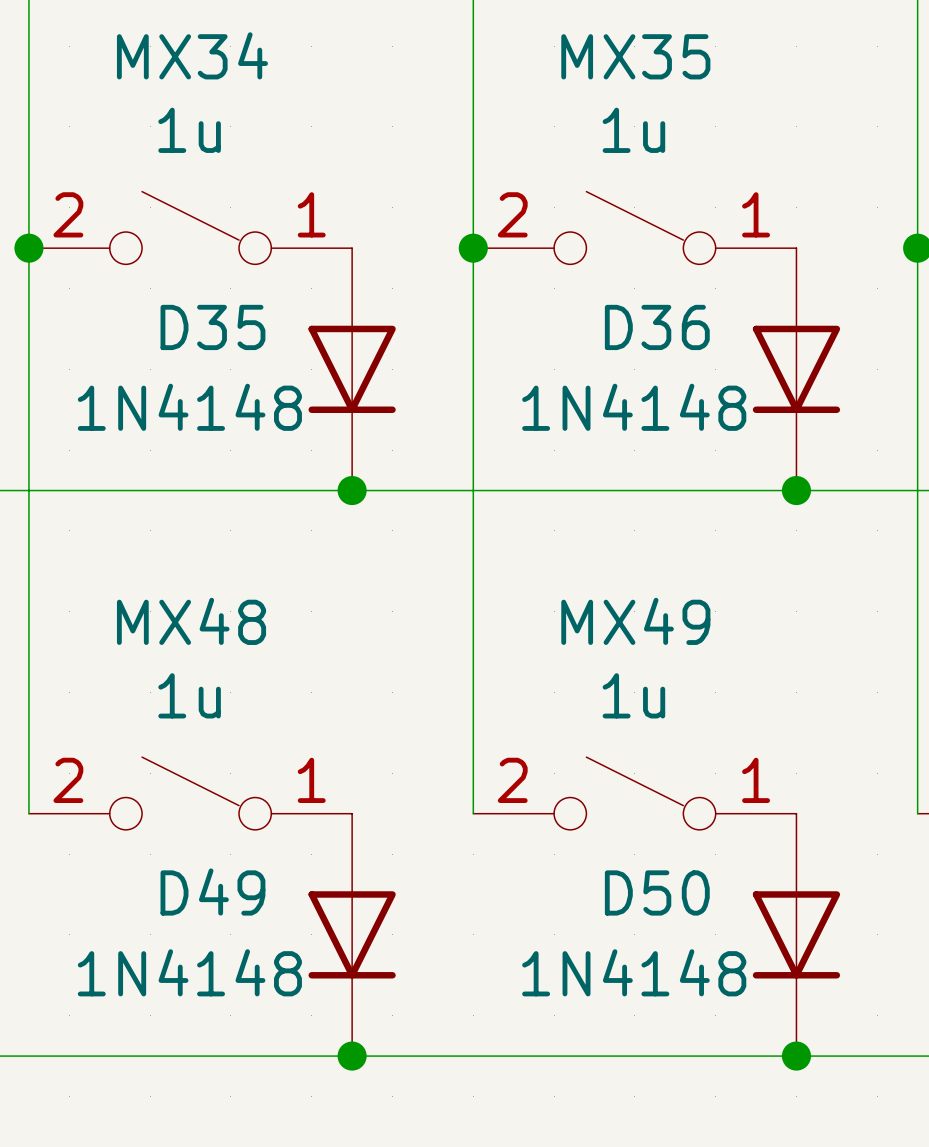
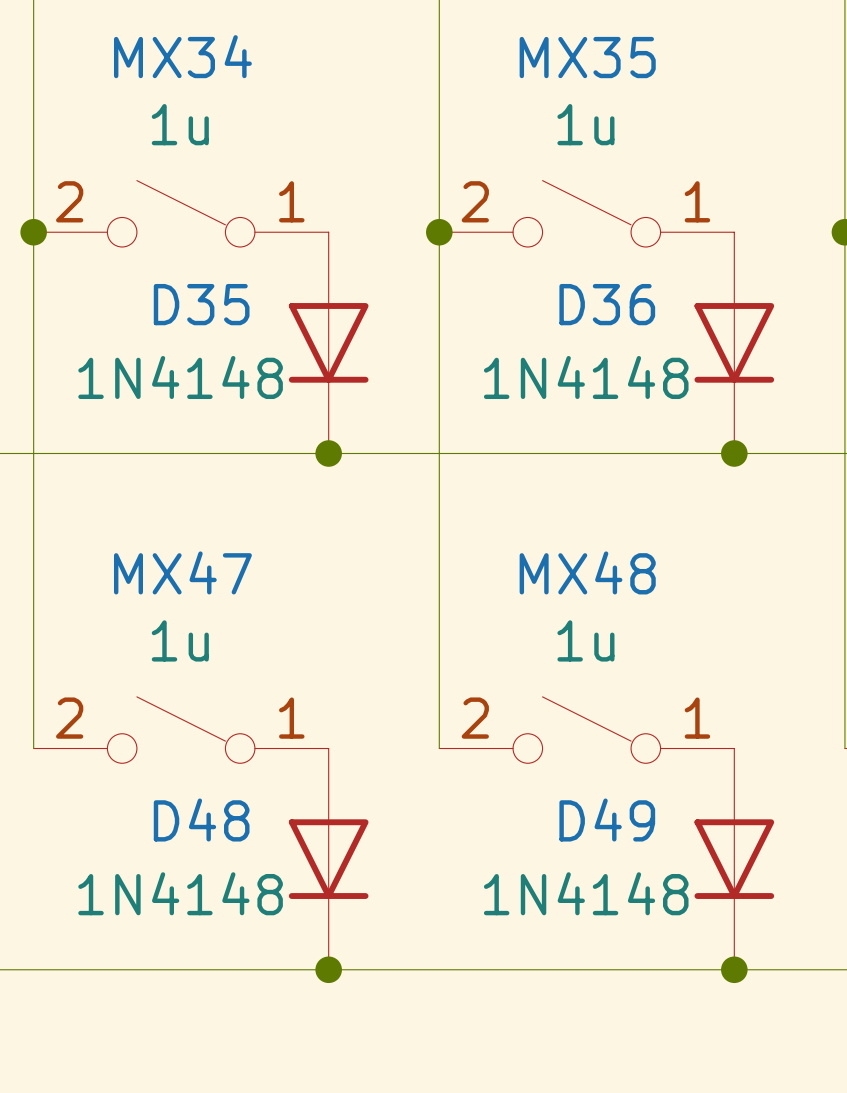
MX48 name: MX48 (191, 621) -> MX47 (182, 572)
MX49 name: MX49 (635, 621) -> MX48 (587, 572)
D49 name: D49 (212, 892) -> D48 (201, 820)
D50 name: D50 (657, 892) -> D49 (607, 820)

